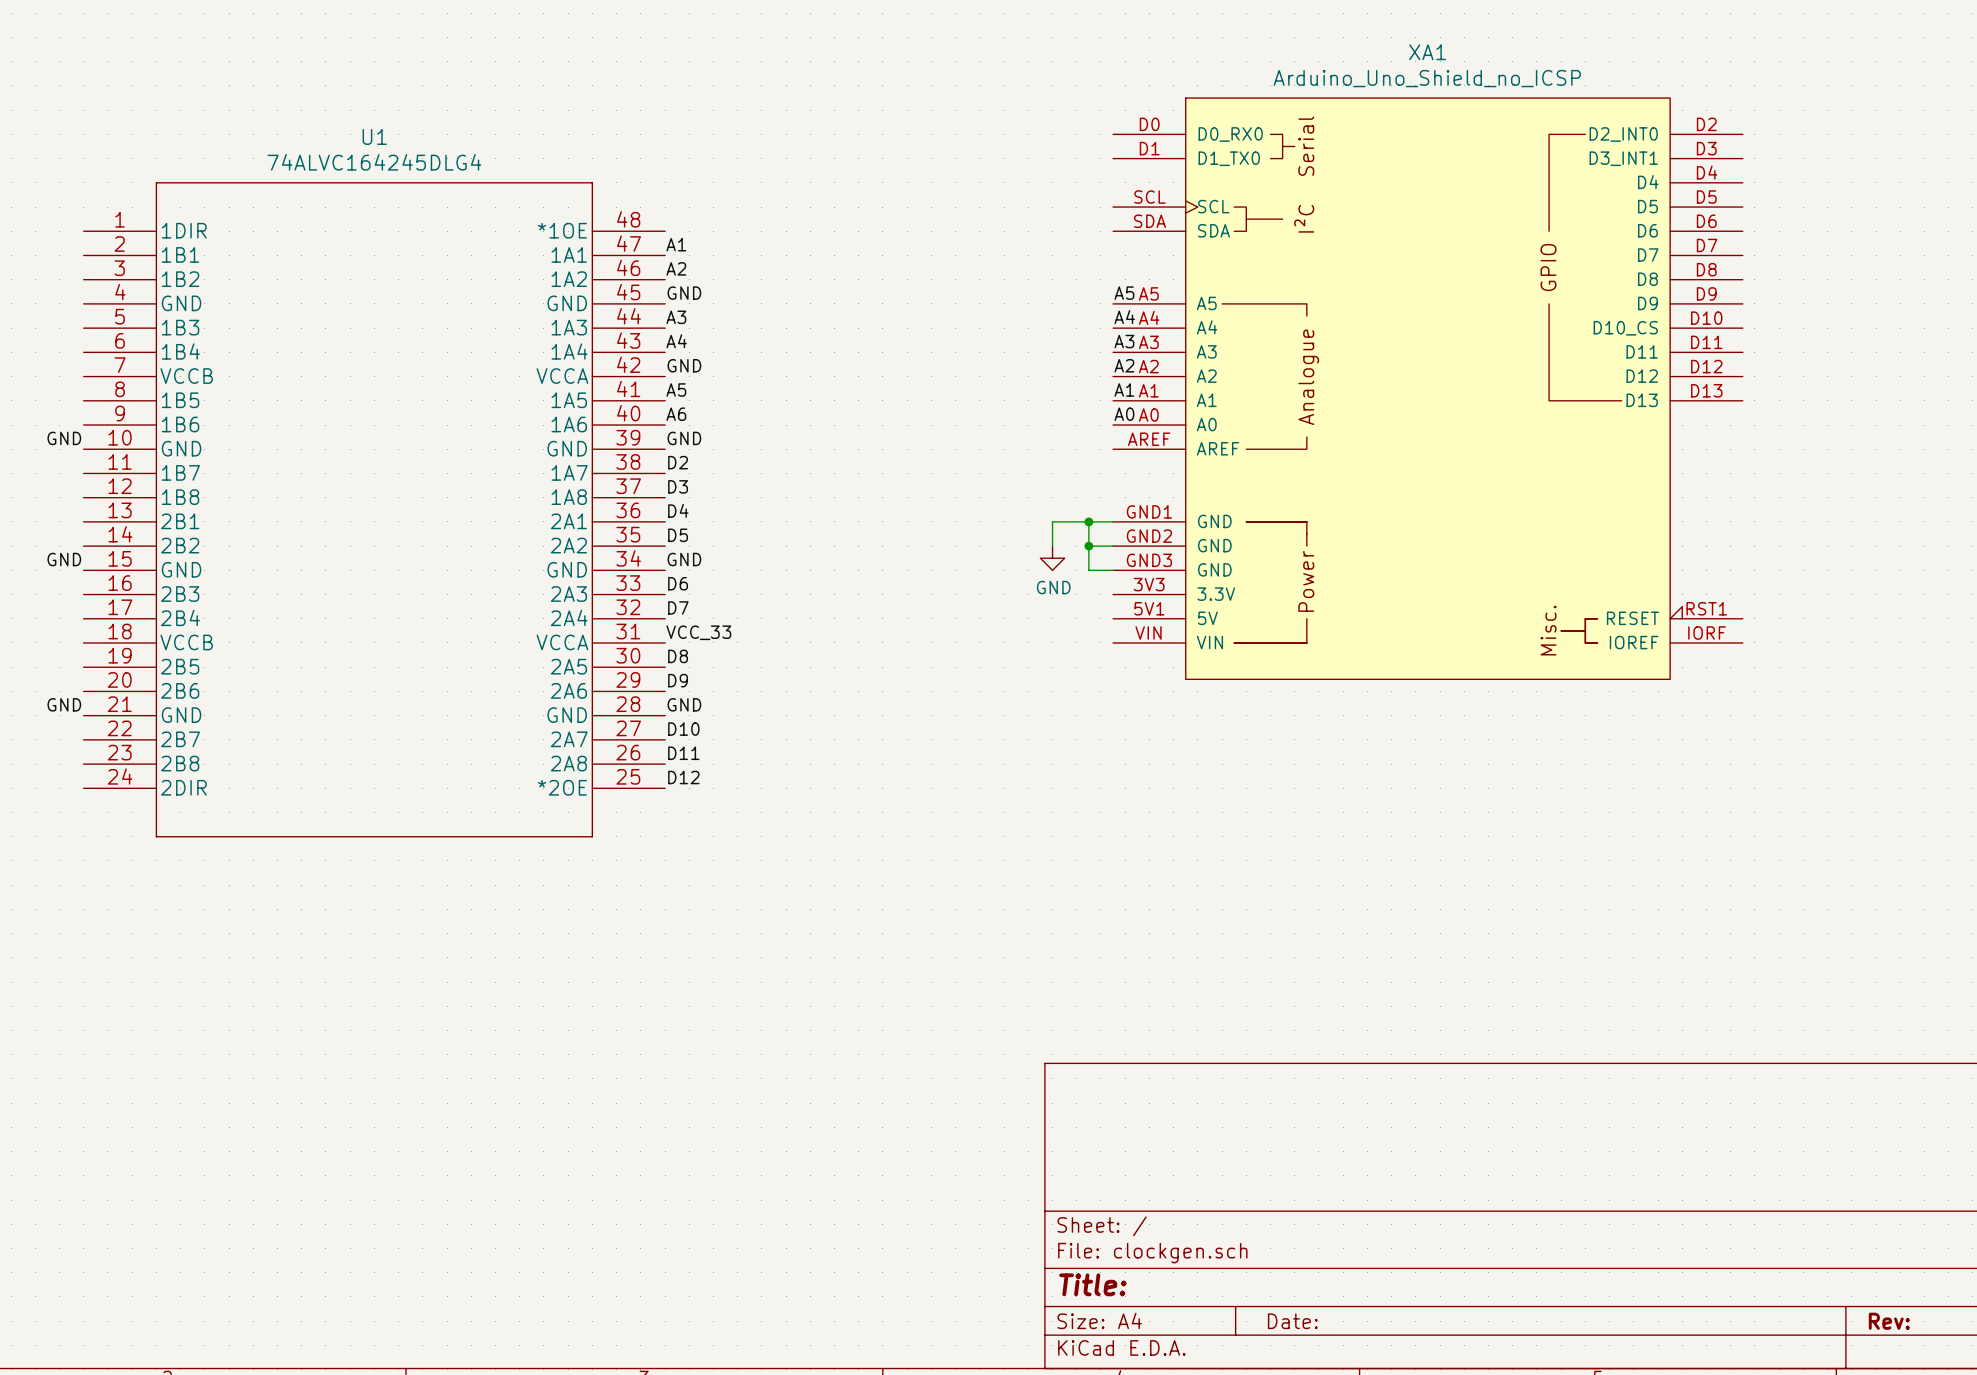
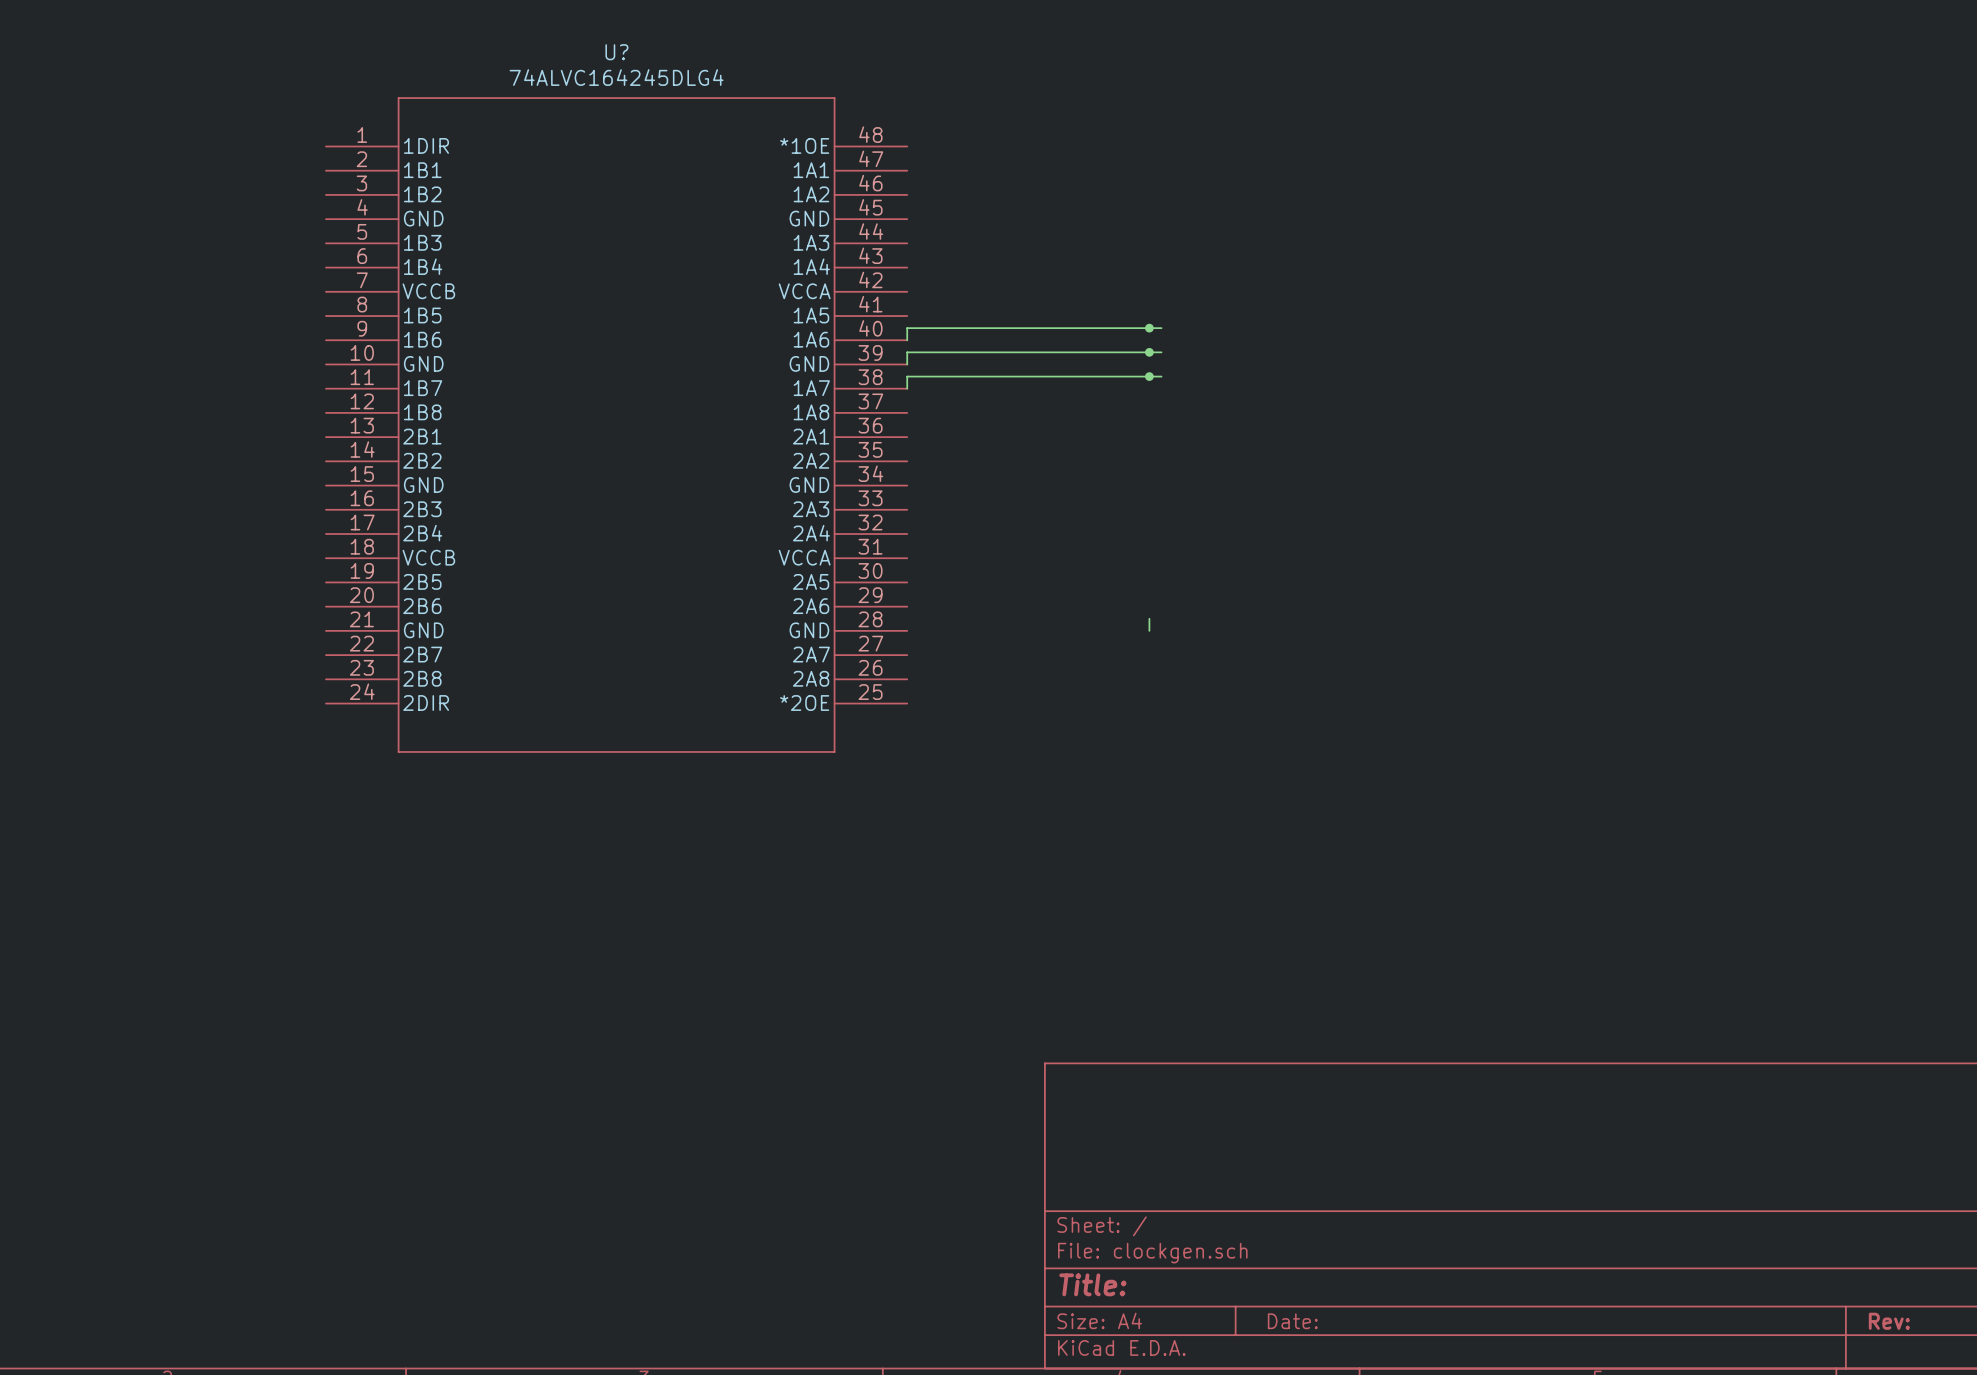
label: A1 (676, 244) -> none
label: A2 (676, 268) -> none
label: GND (684, 293) -> none
label: A5 (1124, 293) -> none
label: A3 (676, 317) -> none
label: A4 (1124, 317) -> none
junction: none -> (1149, 328)
wire: none -> (1161, 328) (907, 328) (907, 340)
label: A4 (676, 341) -> none
label: A3 (1124, 341) -> none
junction: none -> (1149, 352)
wire: none -> (1161, 352) (907, 352) (907, 364)
label: GND (684, 365) -> none
label: A2 (1124, 365) -> none
junction: none -> (1149, 376)
wire: none -> (1161, 376) (907, 376) (907, 388)
XA1: Arduino_Uno_Shield_no_ICSP (1427, 388) -> none
label: A5 (676, 389) -> none
label: A1 (1124, 389) -> none
label: A6 (676, 414) -> none
label: A0 (1124, 414) -> none
U?: none -> 74ALVC164245DLG4 (616, 425)
label: GND (64, 438) -> none
label: GND (684, 438) -> none
label: D2 (678, 462) -> none
label: D3 (678, 486) -> none
U1: 74ALVC164245DLG4 (374, 509) -> none
label: D4 (678, 510) -> none
wire: (1088, 521) (1088, 570) (1113, 570) -> none
junction: (1088, 521) -> none
wire: (1113, 521) (1052, 521) (1052, 546) -> none
label: D5 (678, 535) -> none
wire: (1088, 546) (1113, 546) -> none
junction: (1088, 546) -> none
power symbol: GND (1052, 558) -> none
label: GND (64, 559) -> none
label: GND (684, 559) -> none
label: D6 (678, 583) -> none
label: D7 (678, 607) -> none
wire: none -> (1149, 618) (1149, 630)
label: VCC_33 (698, 632) -> none
label: D8 (678, 656) -> none
label: D9 (678, 680) -> none
label: GND (64, 704) -> none
label: GND (684, 704) -> none
label: D10 (683, 729) -> none
label: D11 (683, 753) -> none
label: D12 (683, 777) -> none

